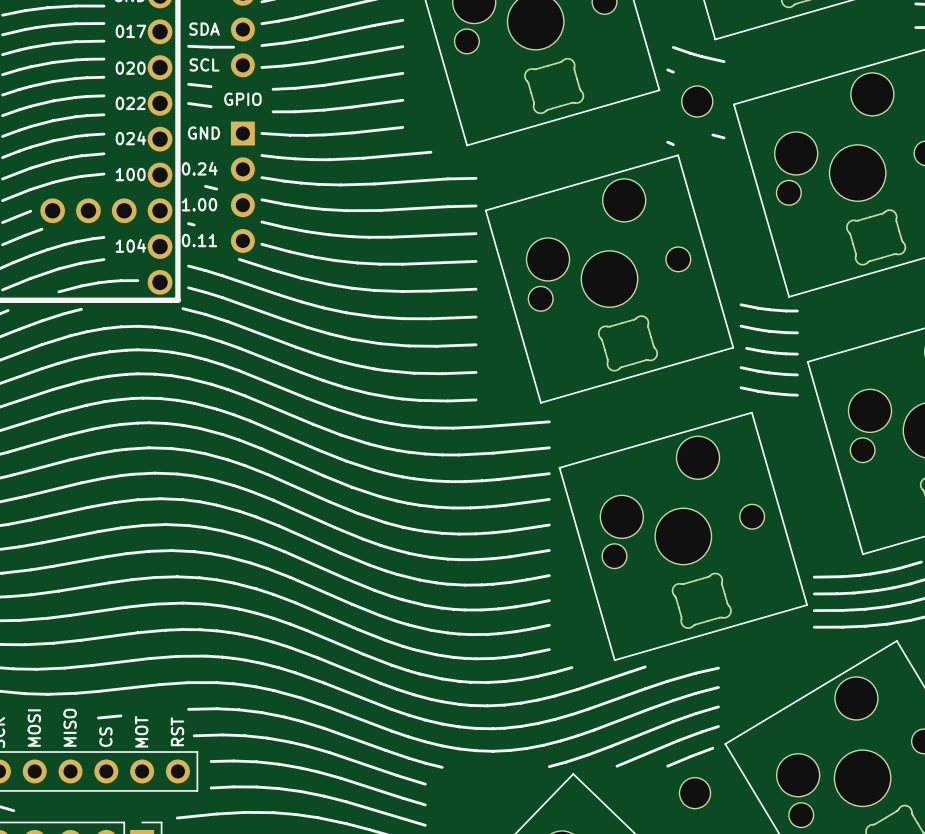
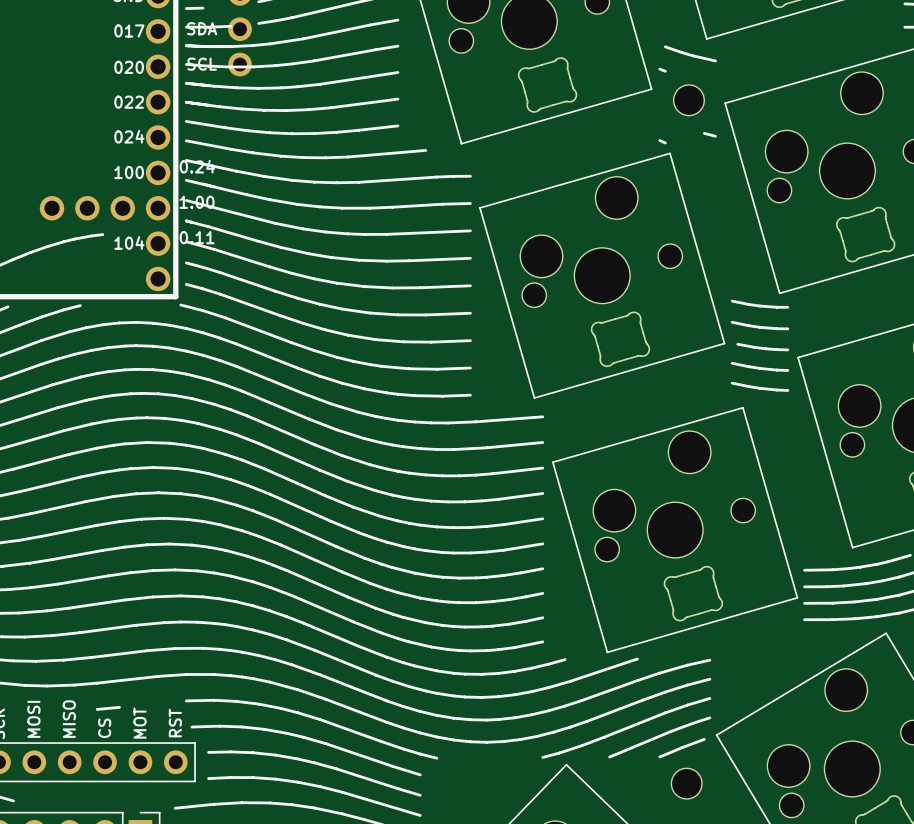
line: (103, 6) (47, 7) (2, 15) -> none
line: none -> (203, 8) (186, 8)
line: (103, 23) (53, 25) (2, 34) -> none
line: none -> (230, 26) (186, 27)
line: (306, 39) (261, 45) -> (303, 38) (253, 45) (186, 45)
line: (103, 41) (53, 43) (2, 54) -> none
line: (402, 46) (312, 62) (261, 67) -> (397, 46) (275, 65) (230, 67) (186, 64)
line: (103, 59) (53, 62) (2, 74) -> none
line: (103, 77) (53, 81) (2, 95) -> none
line: (323, 85) (273, 89) -> (320, 84) (258, 88) (186, 83)
line: (103, 95) (53, 100) (2, 115) -> none
text: GPIO (242, 99) -> none
line: (402, 100) (323, 110) (273, 111) -> (397, 99) (331, 107) (286, 110) (242, 109) (186, 102)
line: (103, 114) (53, 120) (2, 136) -> none
line: (402, 127) (323, 134) (261, 133) -> (397, 125) (336, 132) (292, 133) (247, 130) (186, 121)
text: GND (204, 133) -> none
line: (103, 134) (53, 140) (2, 157) -> none
line: (430, 152) (329, 159) (261, 155) -> (425, 150) (347, 157) (303, 157) (253, 152) (186, 140)
line: (103, 153) (53, 161) (2, 178) -> none
line: (103, 174) (53, 182) (2, 200) -> none
line: (261, 177) (301, 183) (340, 184) (476, 178) -> (186, 160) (264, 176) (314, 182) (359, 182) (470, 176)
part: (242, 187) -> none
line: (261, 199) (306, 207) (346, 210) (476, 205) -> (186, 180) (269, 199) (320, 206) (370, 208) (470, 203)
line: (30, 211) (2, 222) -> none
line: (261, 221) (306, 231) -> (186, 200) (303, 228)
line: (41, 229) (2, 244) -> none
line: (261, 244) (312, 256) (357, 262) (402, 264) (476, 261) -> (186, 220) (281, 247) (331, 257) (386, 261) (470, 258)
line: (103, 259) (58, 268) (2, 289) -> none
line: (239, 259) (301, 278) (352, 288) (402, 291) (476, 289) -> (186, 241) (292, 273) (336, 283) (392, 287) (470, 285)
line: (137, 280) (98, 282) (58, 291) -> none

